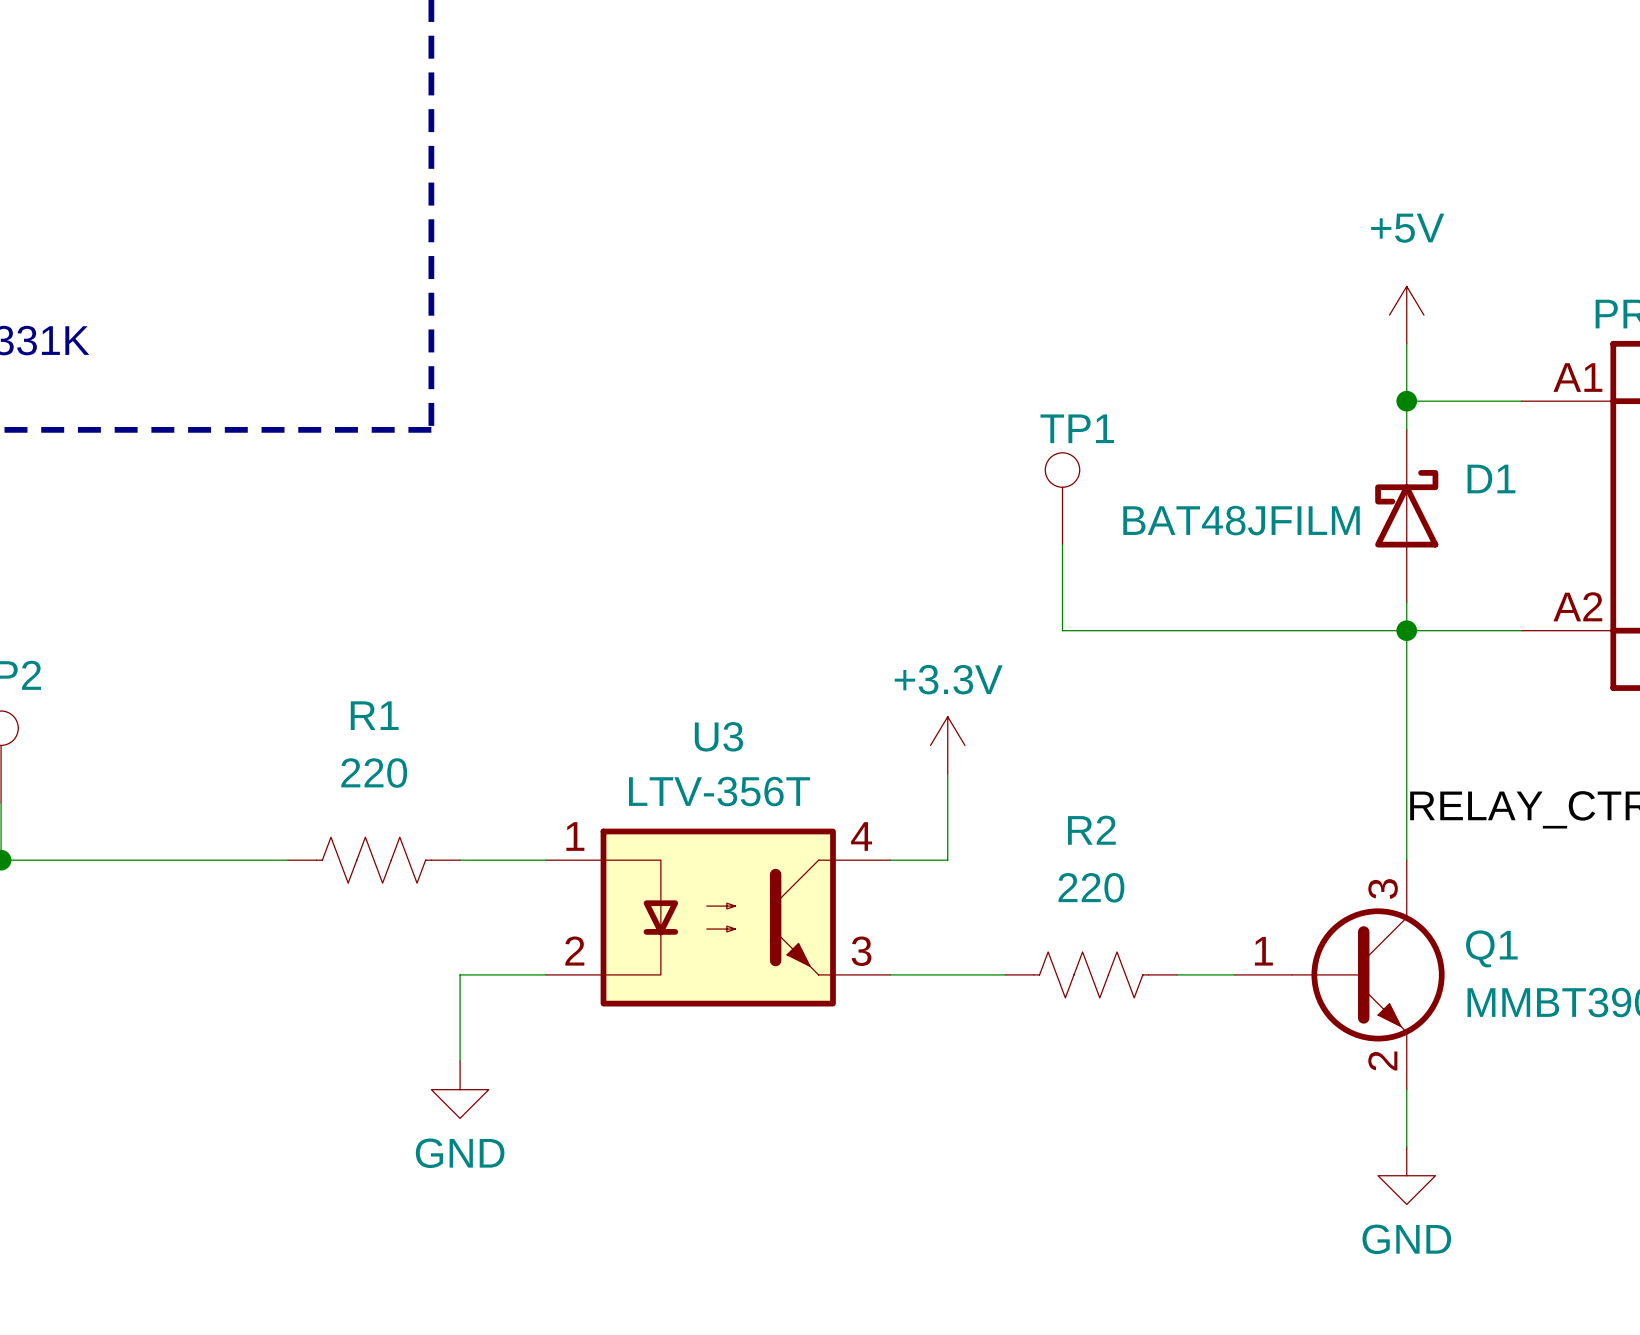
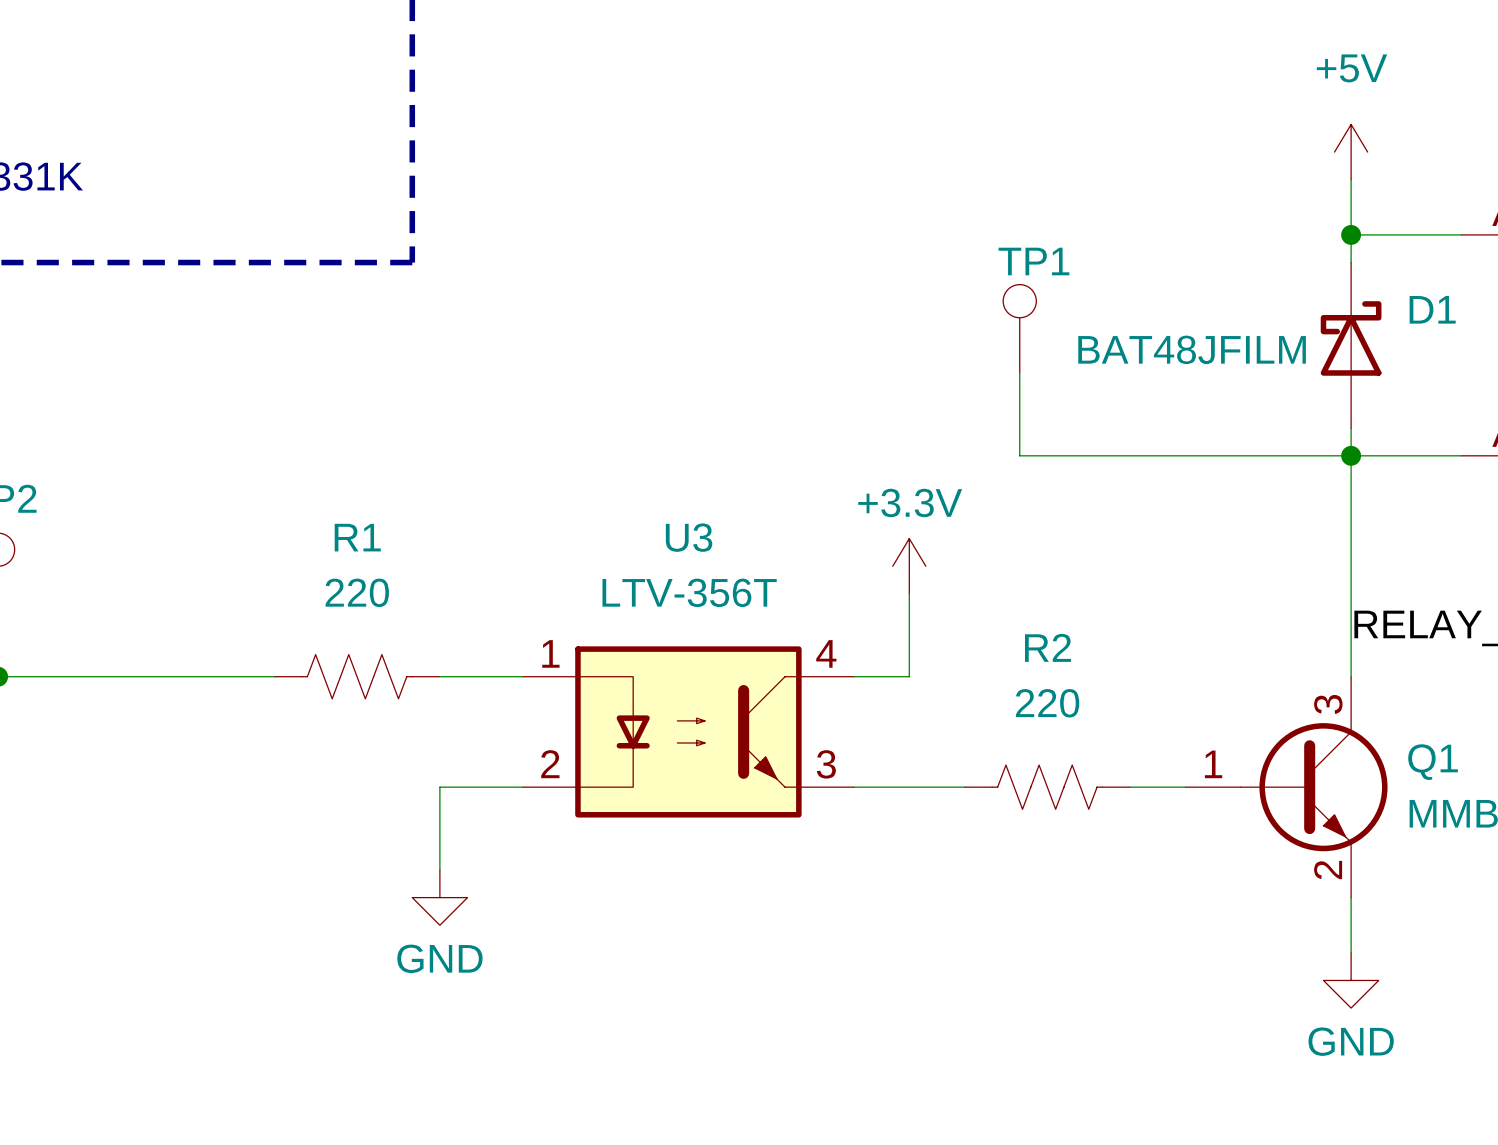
U3 name position: U3 (718, 736) -> U3 (689, 537)
U3 value position: LTV-356T (719, 791) -> LTV-356T (689, 592)

